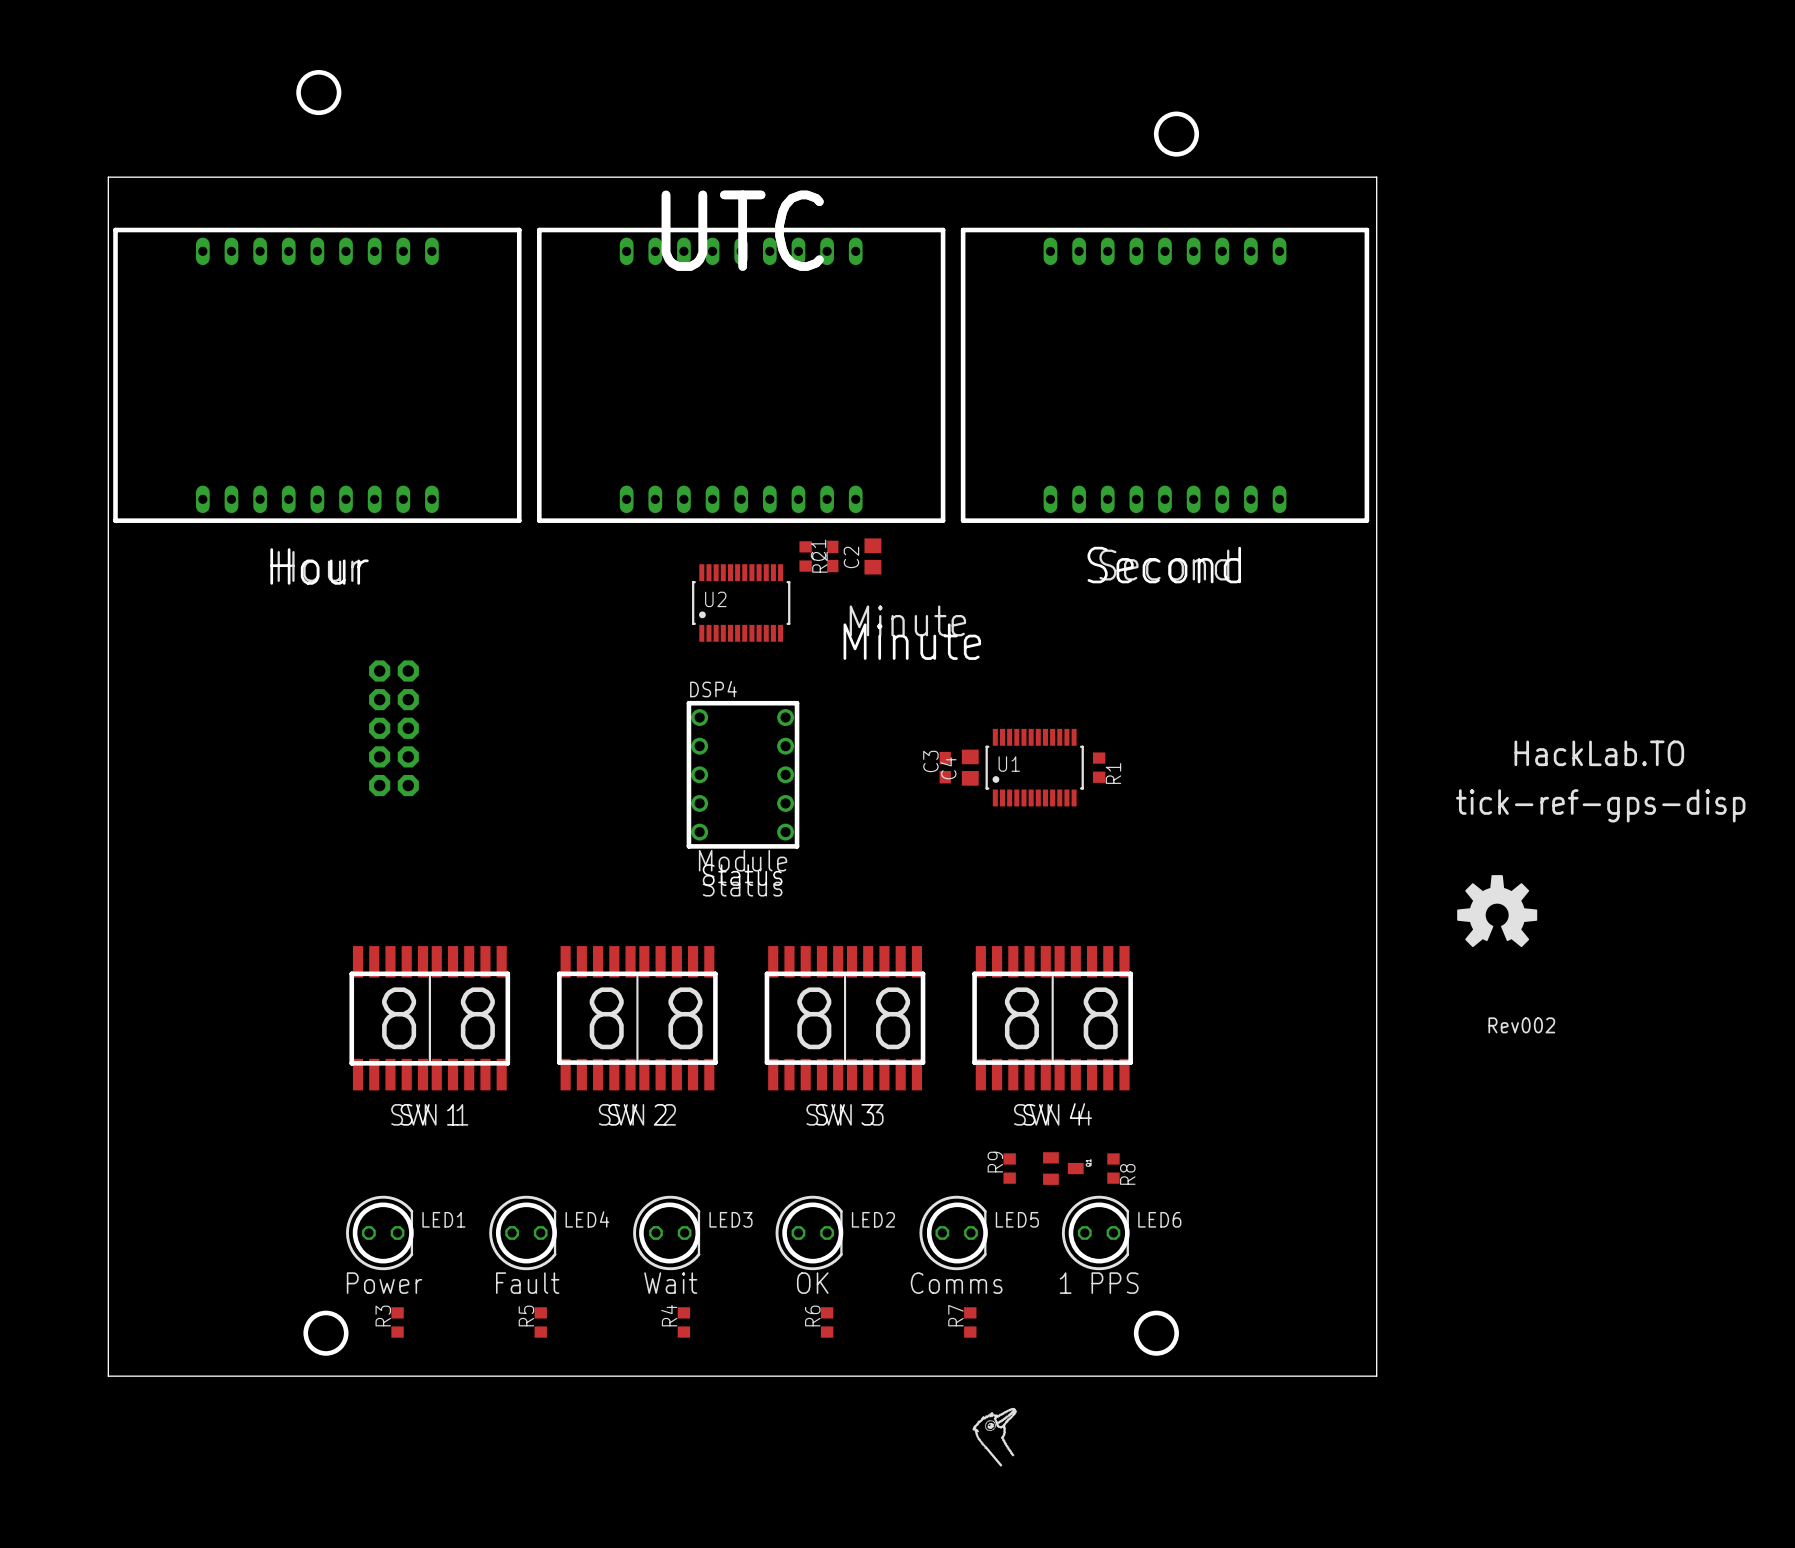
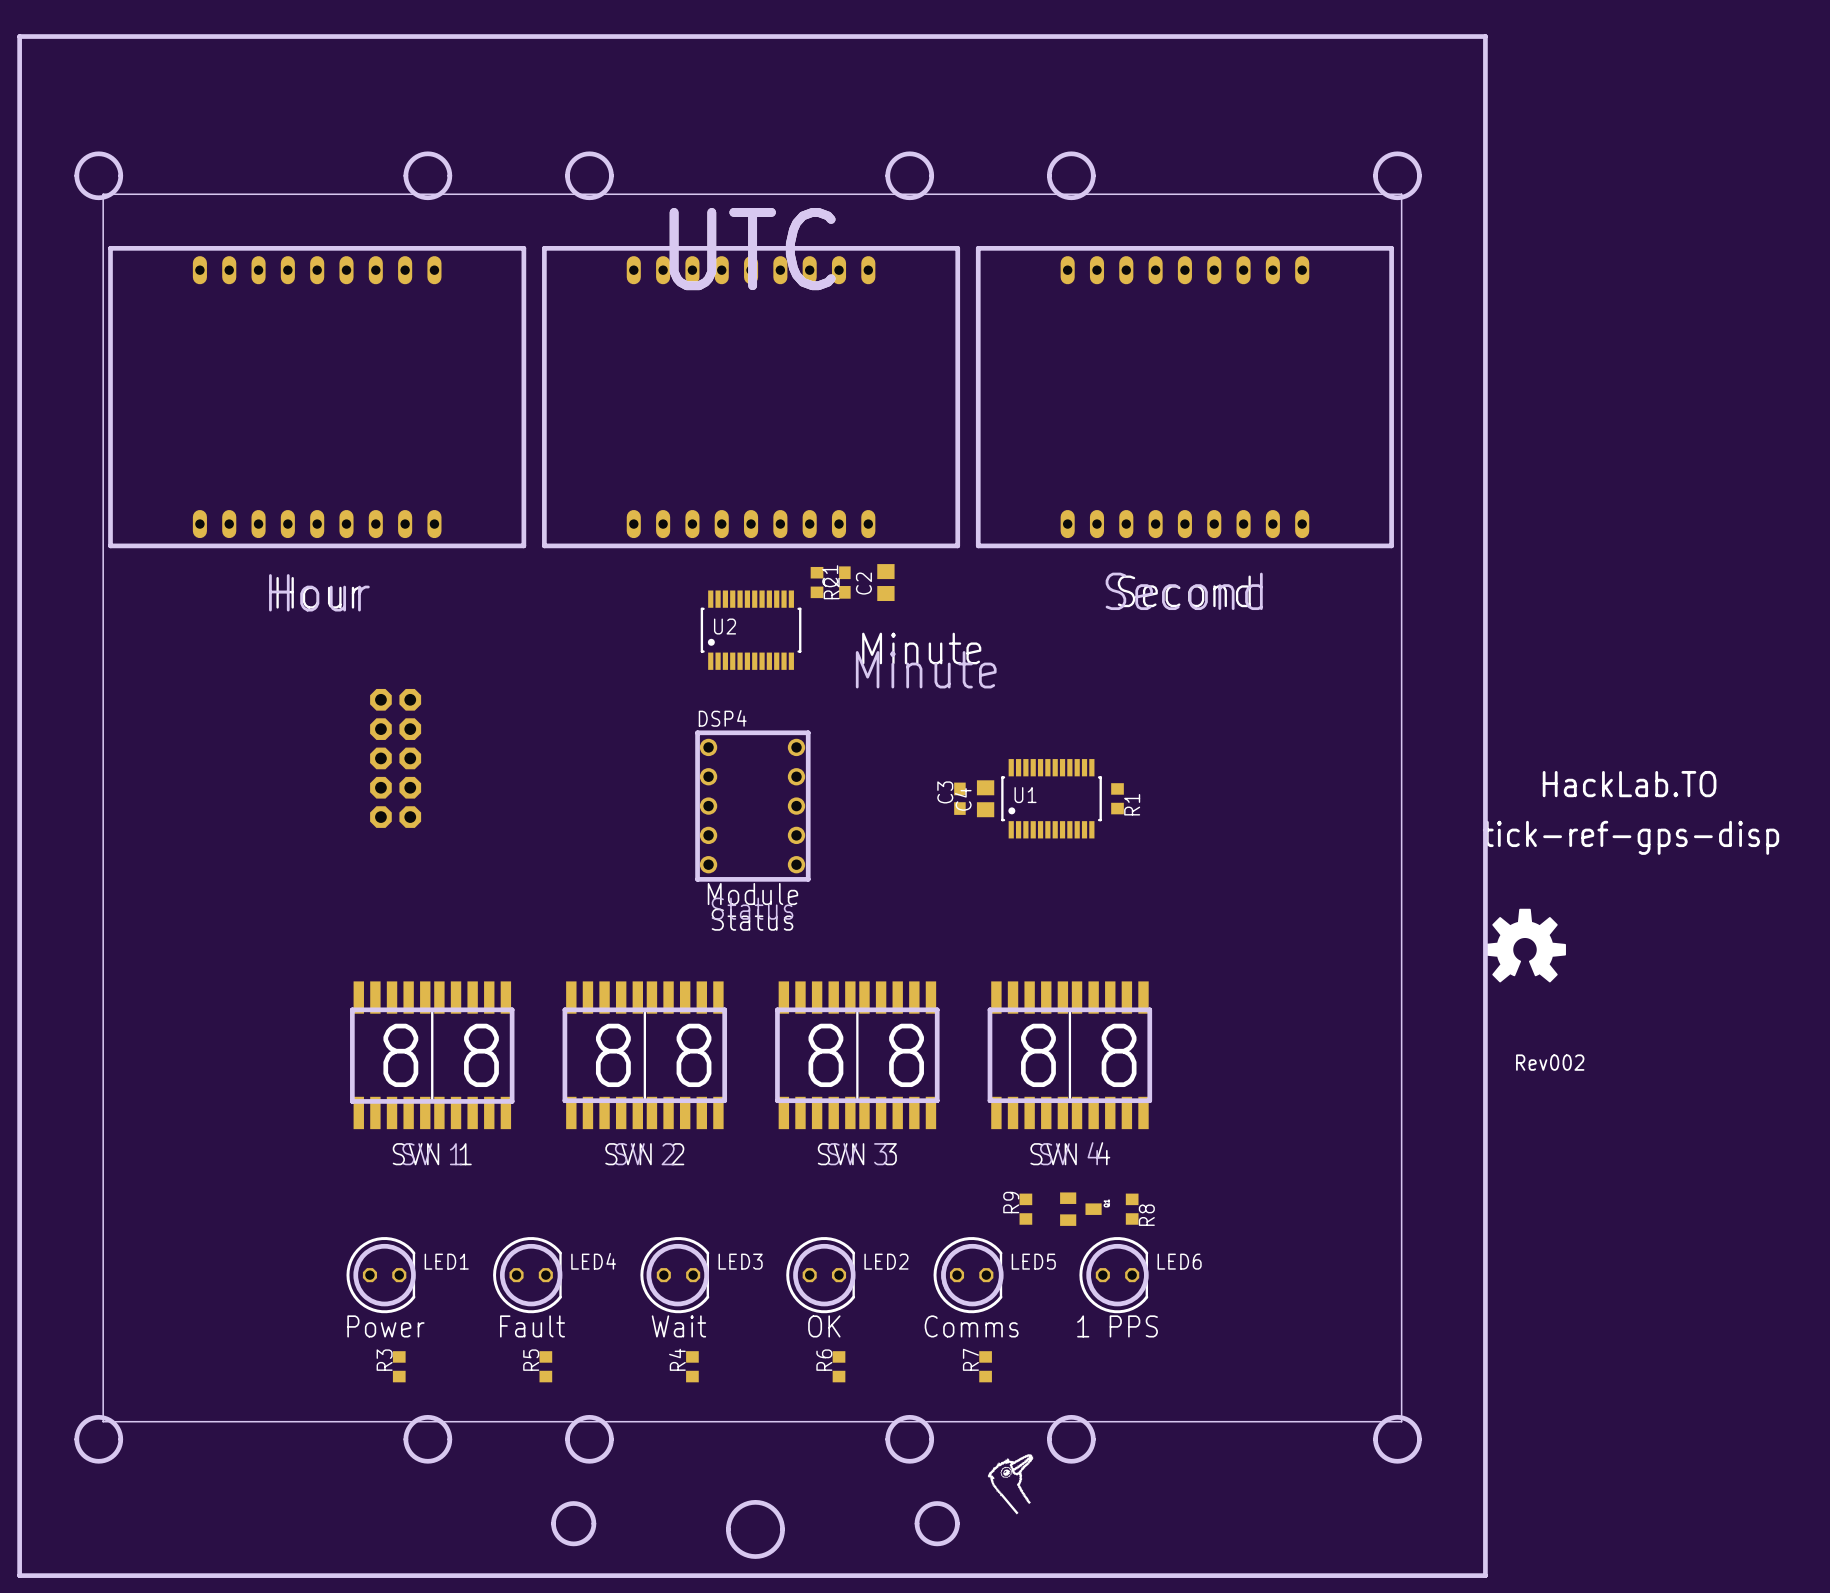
board edge: none -> (19, 36) (19, 1575) (1485, 1575) (1485, 36) (19, 36)
round board edge: [296, 70, 342, 116] -> none
round board edge: [1153, 111, 1200, 157] -> none
board edge: none -> (76, 175) (78, 167) (83, 160) (90, 155) (98, 153) (107, 155) (114, 160) (119, 167) (120, 175) (119, 184) (114, 191) (107, 196) (98, 197) (90, 196) (83, 191) (78, 184) (76, 175)
board edge: none -> (405, 175) (407, 167) (412, 160) (419, 155) (427, 153) (436, 155) (443, 160) (448, 167) (449, 175) (448, 184) (443, 191) (436, 196) (427, 197) (419, 196) (412, 191) (407, 184) (405, 175)
board edge: none -> (567, 175) (569, 167) (573, 160) (581, 155) (589, 153) (597, 155) (605, 160) (609, 167) (611, 175) (609, 184) (605, 191) (597, 196) (589, 197) (581, 196) (573, 191) (569, 184) (567, 175)
board edge: none -> (887, 175) (889, 167) (894, 160) (901, 155) (909, 153) (918, 155) (925, 160) (930, 167) (931, 175) (930, 184) (925, 191) (918, 196) (909, 197) (901, 196) (894, 191) (889, 184) (887, 175)
board edge: none -> (1049, 175) (1051, 167) (1055, 160) (1062, 155) (1071, 153) (1079, 155) (1086, 160) (1091, 167) (1093, 175) (1091, 184) (1086, 191) (1079, 196) (1071, 197) (1062, 196) (1055, 191) (1051, 184) (1049, 175)
board edge: none -> (1375, 175) (1377, 167) (1381, 160) (1389, 155) (1397, 153) (1405, 155) (1413, 160) (1417, 167) (1419, 175) (1417, 184) (1413, 191) (1405, 196) (1397, 197) (1389, 196) (1381, 191) (1377, 184) (1375, 175)
round board edge: [303, 1310, 349, 1356] -> none
round board edge: [1133, 1310, 1179, 1356] -> none
board edge: none -> (76, 1439) (78, 1430) (83, 1423) (90, 1418) (98, 1417) (107, 1418) (114, 1423) (119, 1430) (120, 1439) (119, 1447) (114, 1454) (107, 1459) (98, 1461) (90, 1459) (83, 1454) (78, 1447) (76, 1439)
board edge: none -> (405, 1439) (407, 1430) (412, 1423) (419, 1418) (427, 1417) (436, 1418) (443, 1423) (448, 1430) (449, 1439) (448, 1447) (443, 1454) (436, 1459) (427, 1461) (419, 1459) (412, 1454) (407, 1447) (405, 1439)
board edge: none -> (567, 1439) (569, 1430) (573, 1423) (581, 1418) (589, 1417) (597, 1418) (605, 1423) (609, 1430) (611, 1439) (609, 1447) (605, 1454) (597, 1459) (589, 1461) (581, 1459) (573, 1454) (569, 1447) (567, 1439)
board edge: none -> (887, 1439) (889, 1430) (894, 1423) (901, 1418) (909, 1417) (918, 1418) (925, 1423) (930, 1430) (931, 1439) (930, 1447) (925, 1454) (918, 1459) (909, 1461) (901, 1459) (894, 1454) (889, 1447) (887, 1439)
board edge: none -> (1049, 1439) (1051, 1430) (1055, 1423) (1062, 1418) (1071, 1417) (1079, 1418) (1086, 1423) (1091, 1430) (1093, 1439) (1091, 1447) (1086, 1454) (1079, 1459) (1071, 1461) (1062, 1459) (1055, 1454) (1051, 1447) (1049, 1439)
board edge: none -> (1375, 1439) (1377, 1430) (1381, 1423) (1389, 1418) (1397, 1417) (1405, 1418) (1413, 1423) (1417, 1430) (1419, 1439) (1417, 1447) (1413, 1454) (1405, 1459) (1397, 1461) (1389, 1459) (1381, 1454) (1377, 1447) (1375, 1439)
board edge: none -> (553, 1523) (555, 1515) (559, 1509) (565, 1505) (573, 1503) (581, 1505) (587, 1509) (592, 1515) (593, 1523) (592, 1531) (588, 1537) (581, 1542) (573, 1543) (565, 1542) (559, 1537) (555, 1531) (553, 1523)
board edge: none -> (916, 1523) (918, 1515) (922, 1509) (929, 1505) (937, 1503) (944, 1505) (951, 1509) (955, 1515) (957, 1523)
board edge: none -> (917, 1523) (918, 1531) (922, 1537) (929, 1542) (937, 1543) (944, 1542) (951, 1537) (955, 1531) (957, 1523)
board edge: none -> (728, 1529) (730, 1519) (736, 1510) (745, 1504) (755, 1502) (765, 1504) (774, 1510) (780, 1519) (782, 1529)
board edge: none -> (728, 1529) (730, 1539) (736, 1548) (745, 1554) (755, 1556) (765, 1554) (774, 1548) (780, 1539) (782, 1529)

